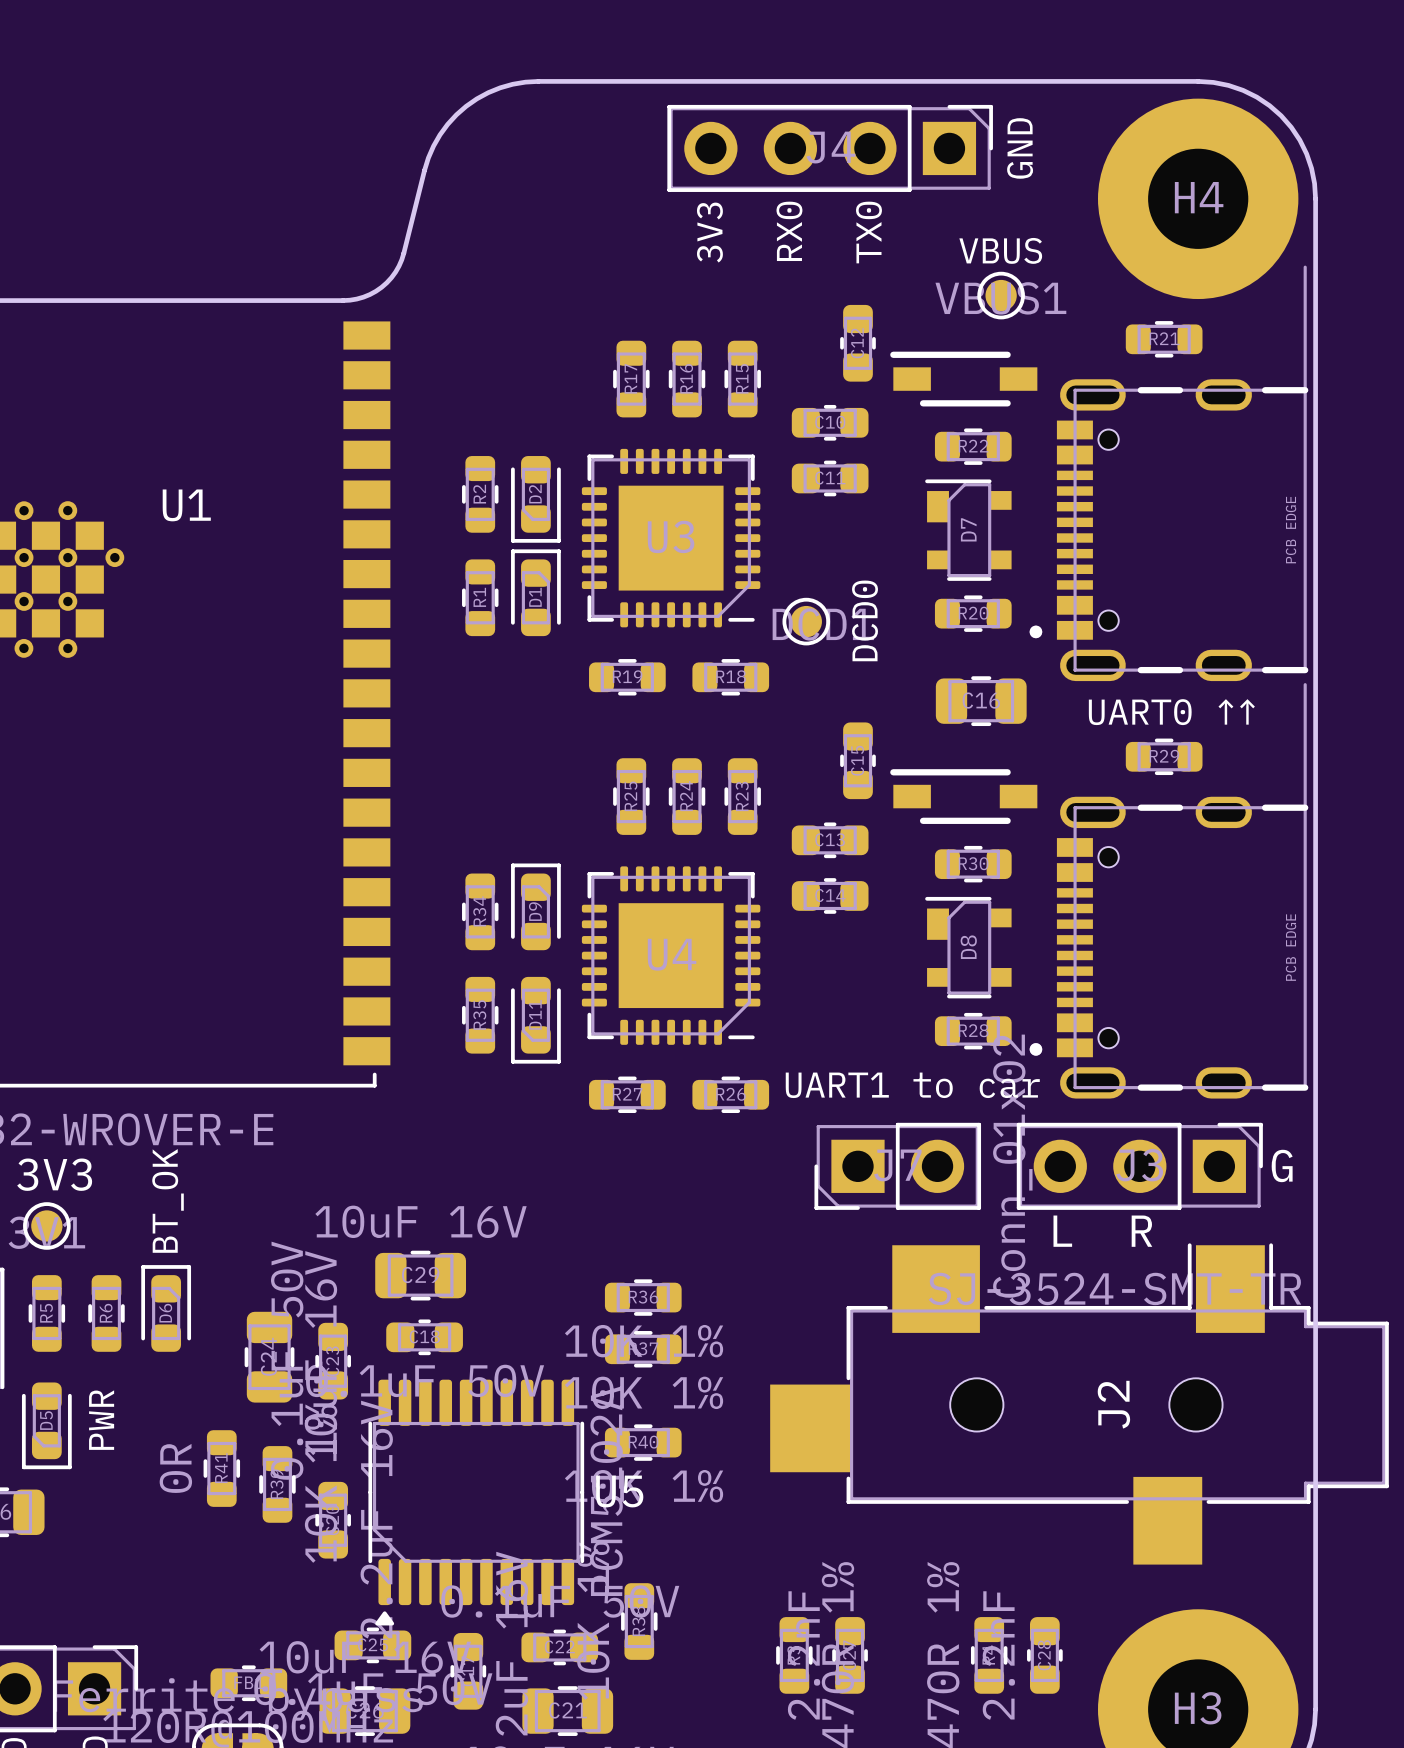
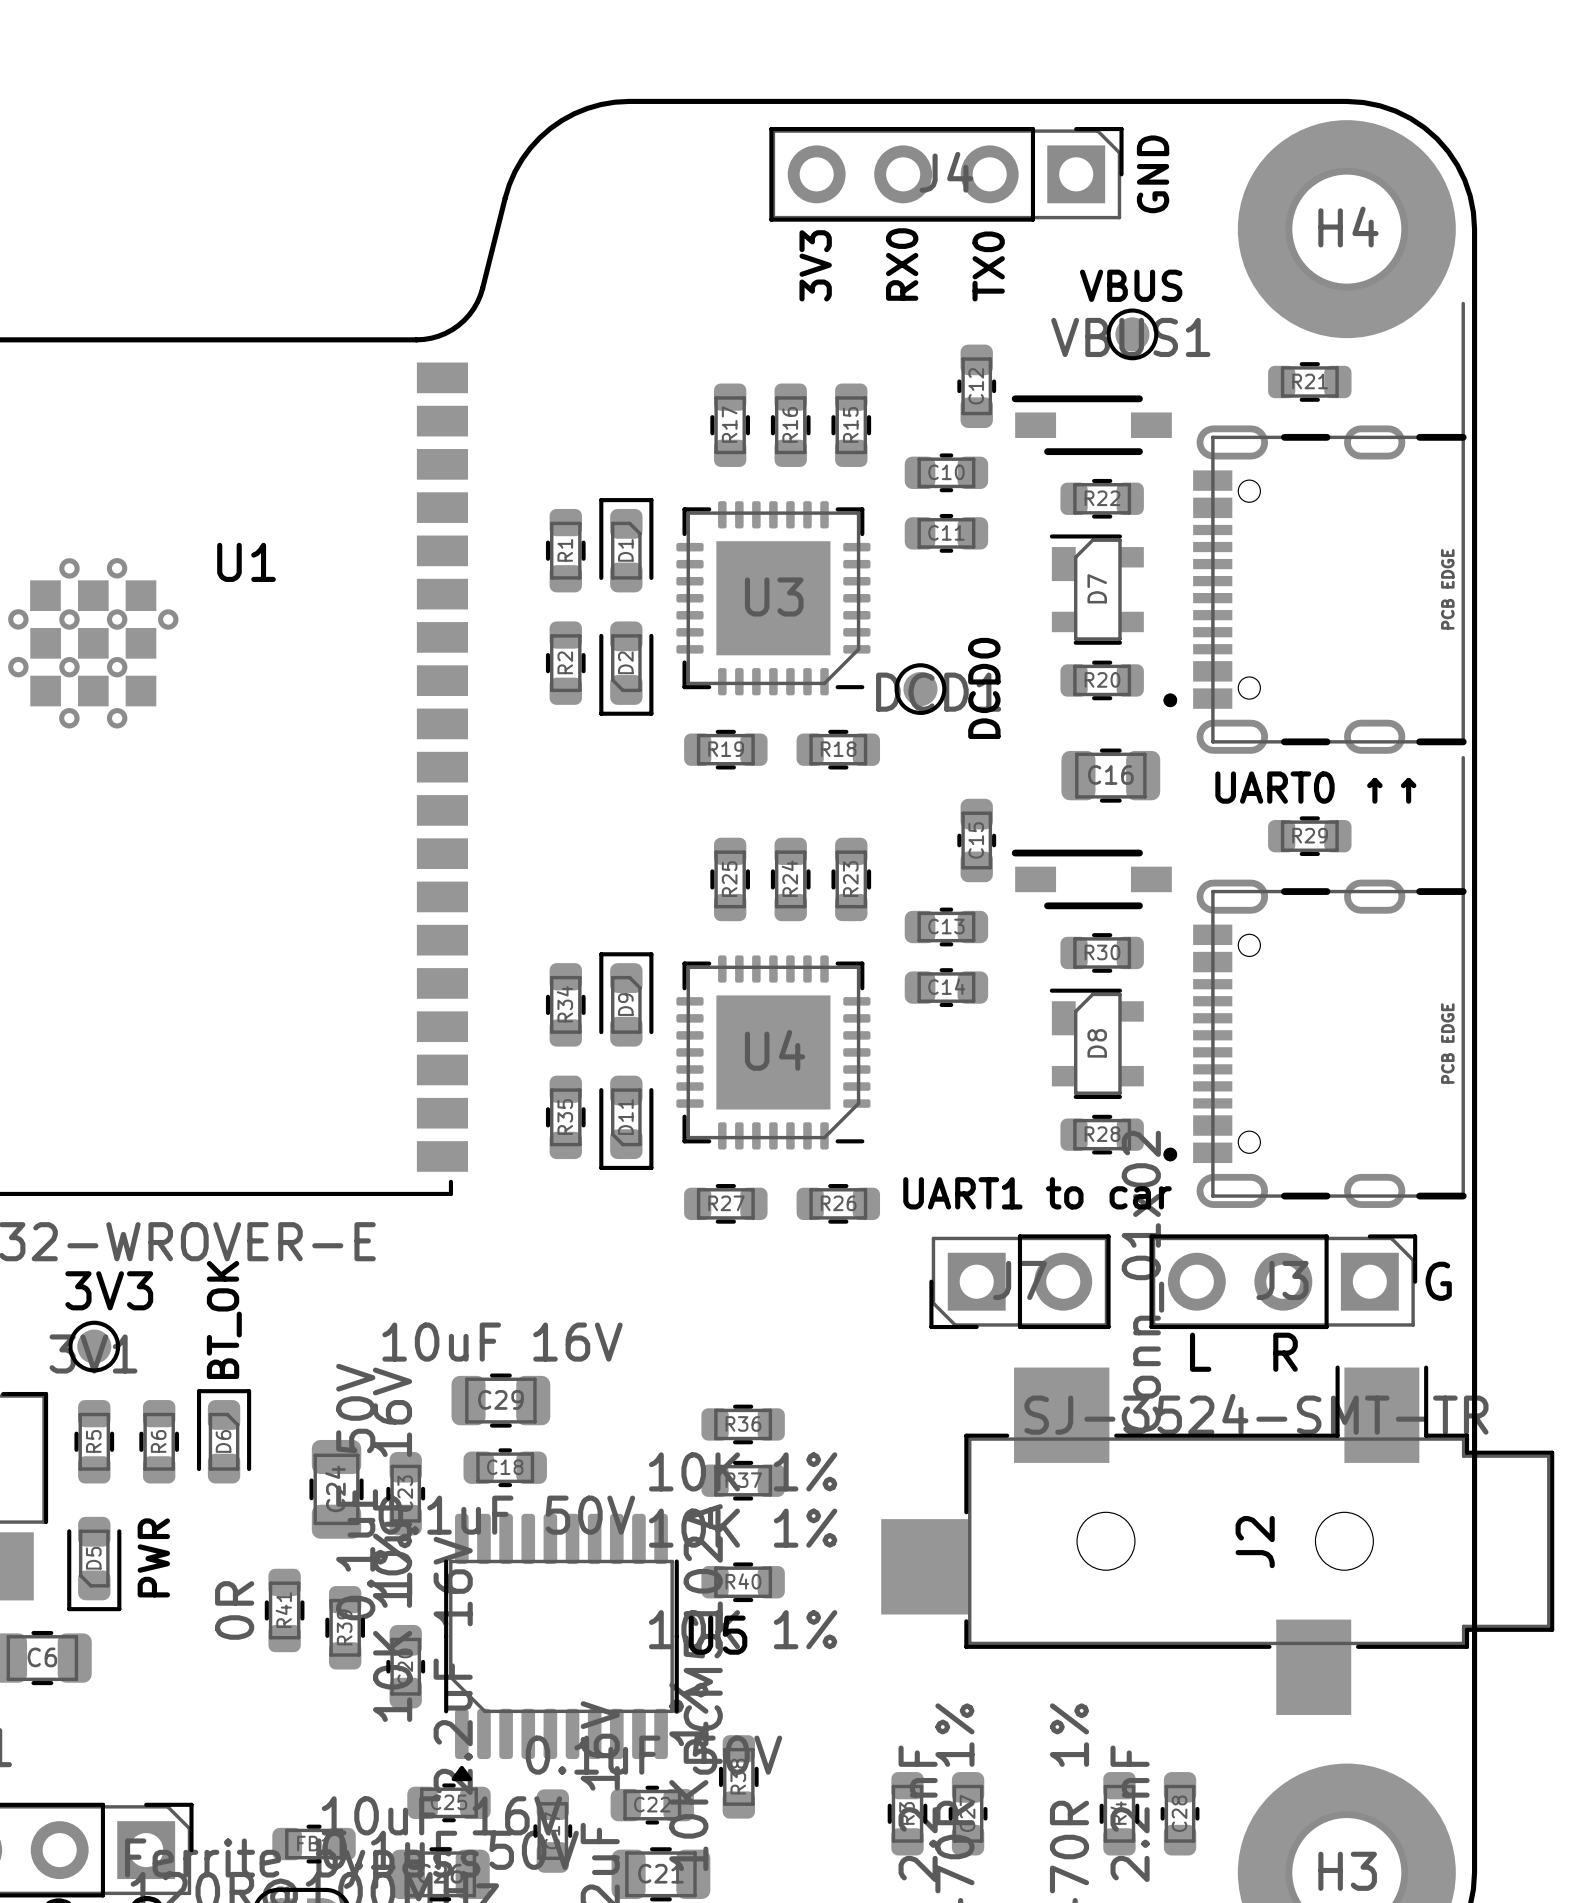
R2 name: R2 (479, 494) -> R1 (565, 550)
D2 position: (535, 499) -> (626, 668)
D1 position: (535, 592) -> (626, 545)
R1 name: R1 (479, 597) -> R2 (565, 662)

